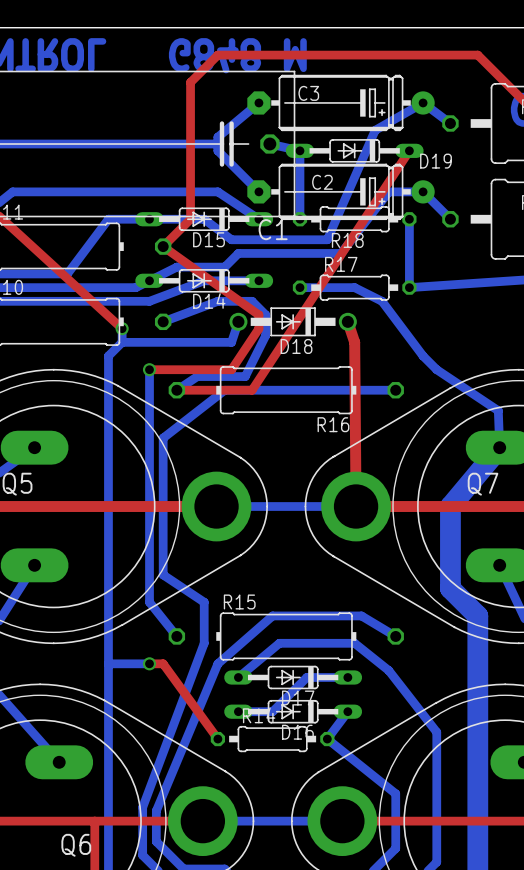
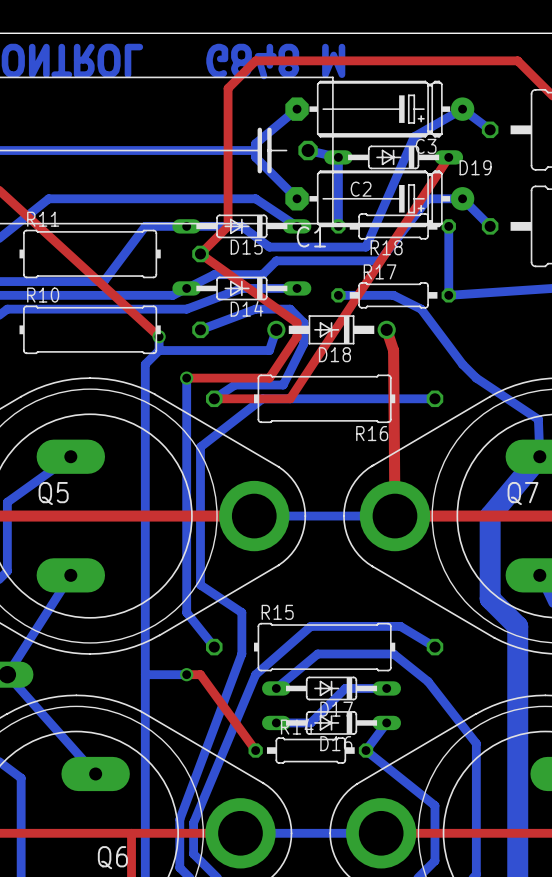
C3 name position: C3 (308, 93) -> C3 (426, 146)

